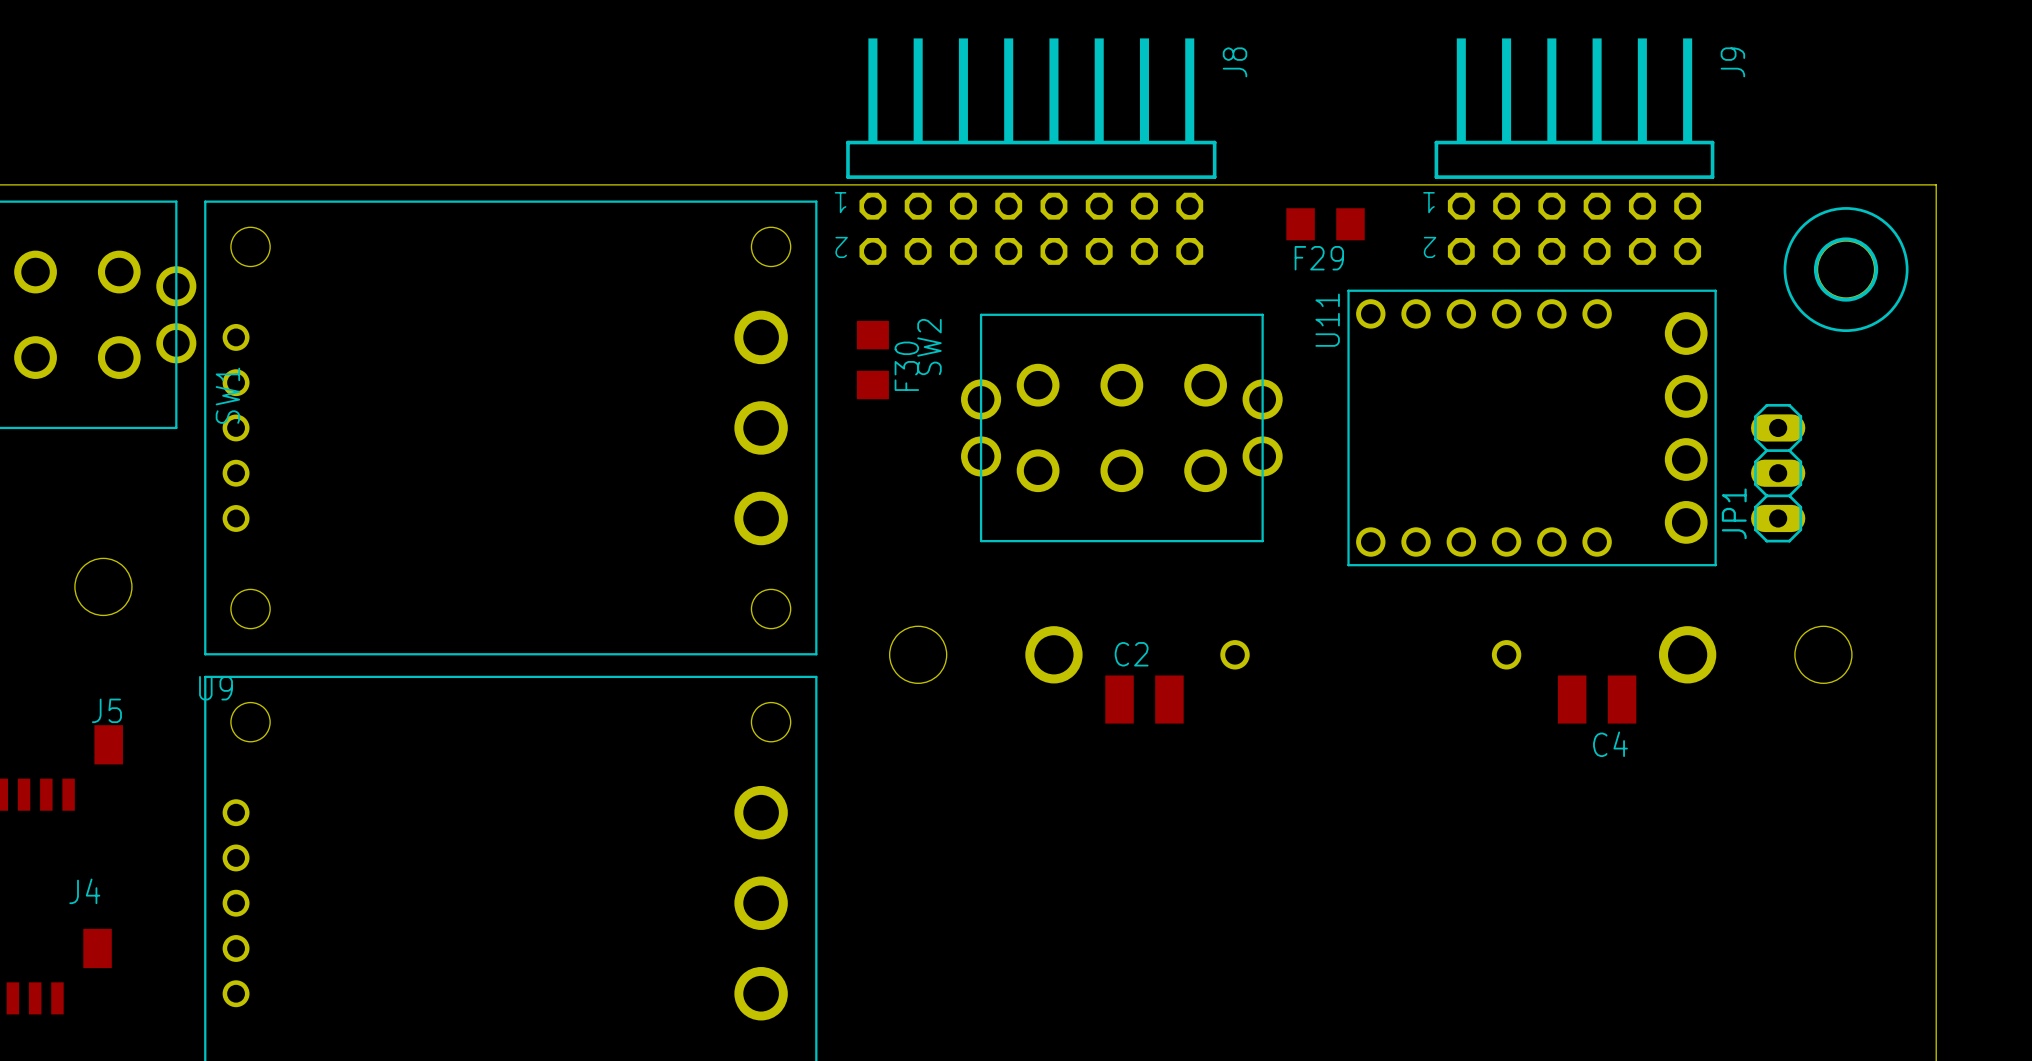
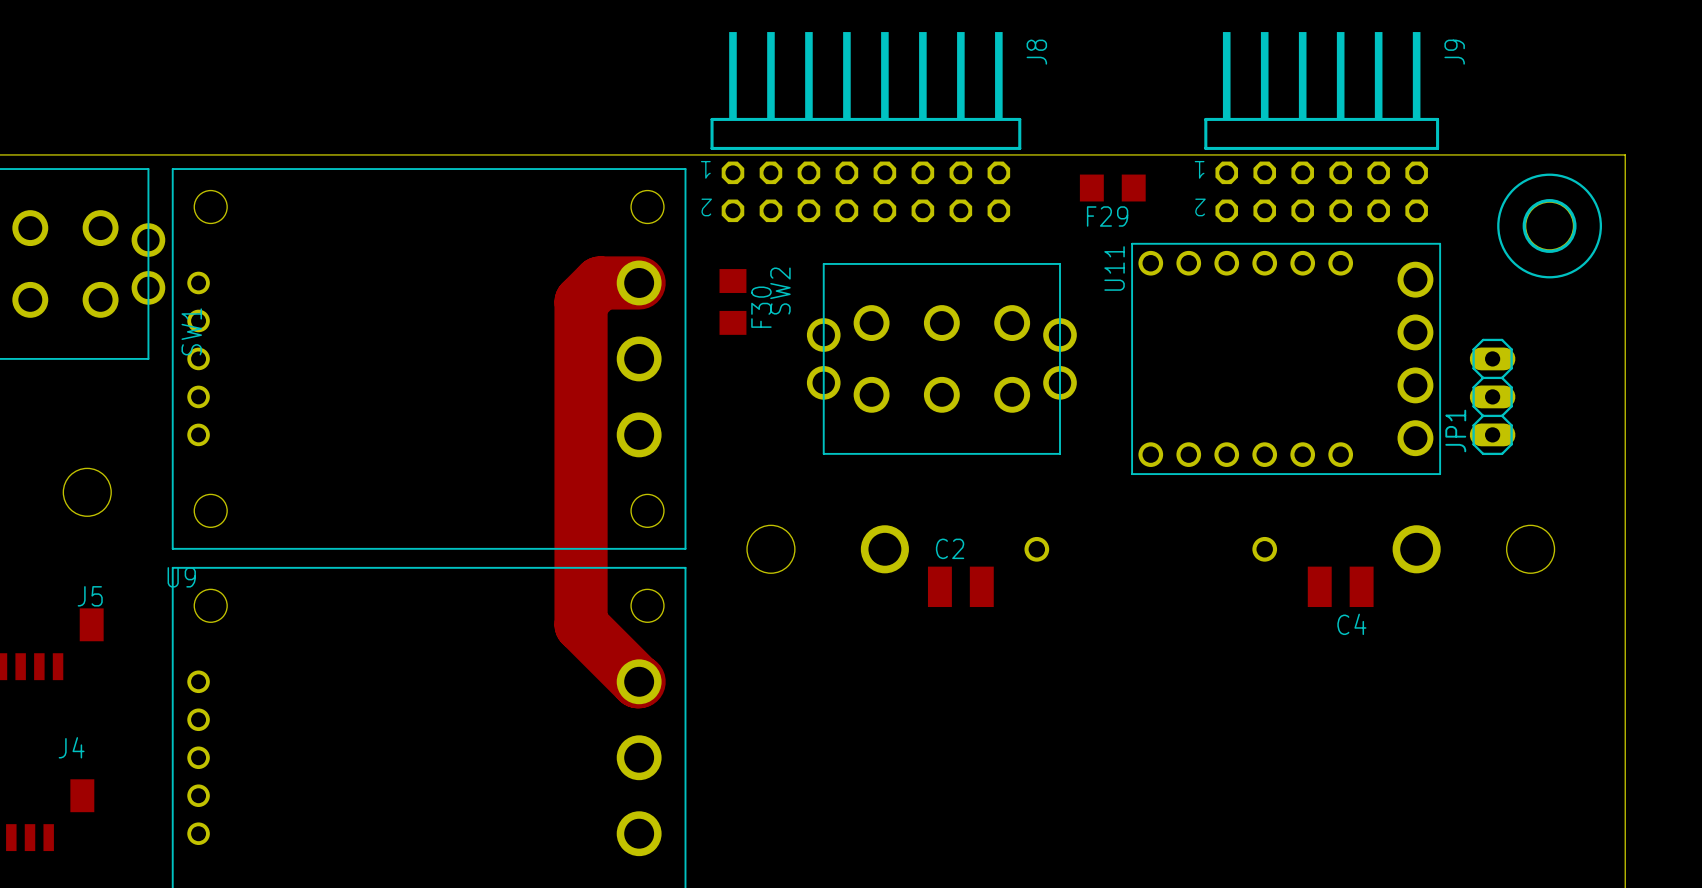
track: none -> (639, 282) (600, 282) (581, 301) (581, 624) (639, 681)

